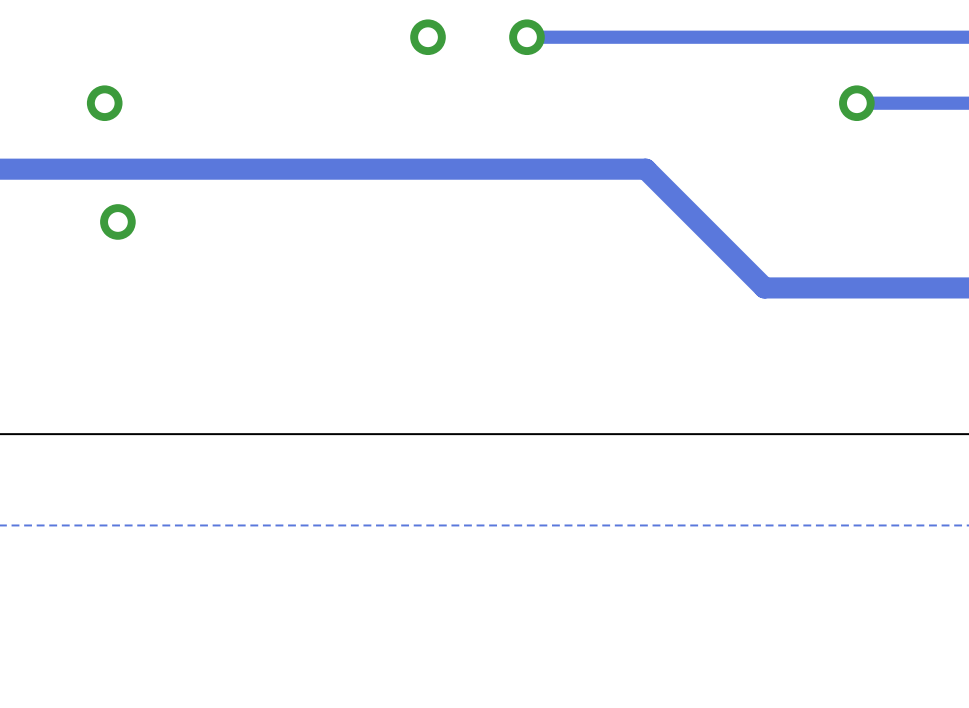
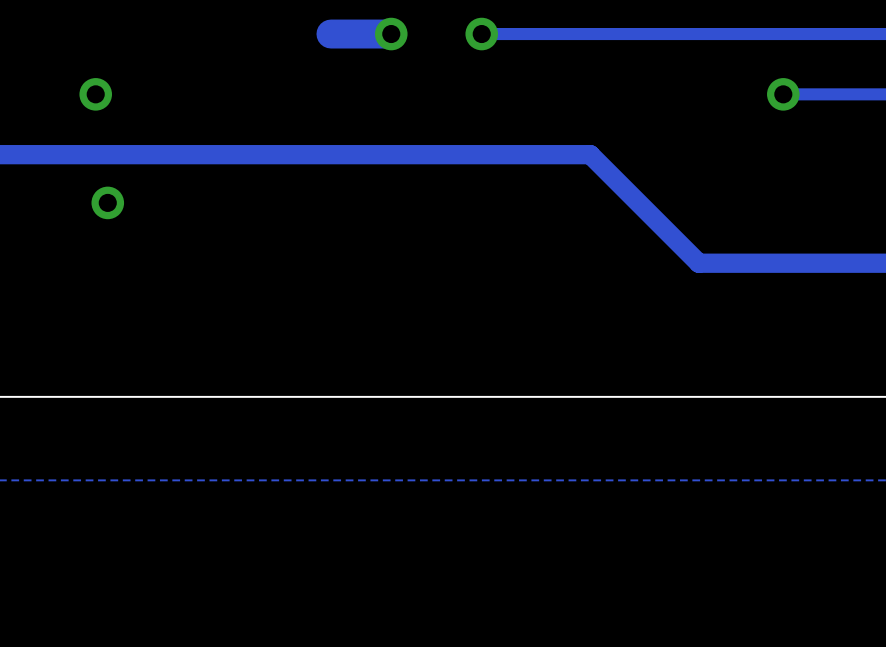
track: none -> (391, 34) (330, 34)

